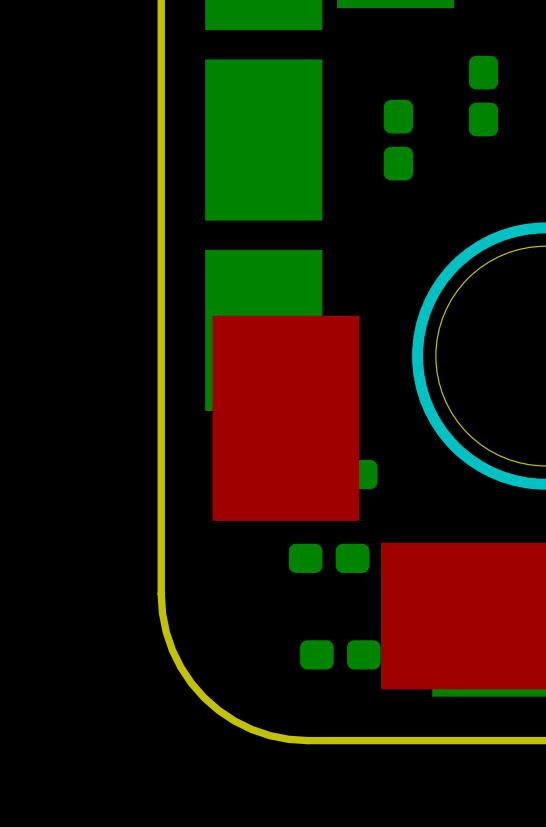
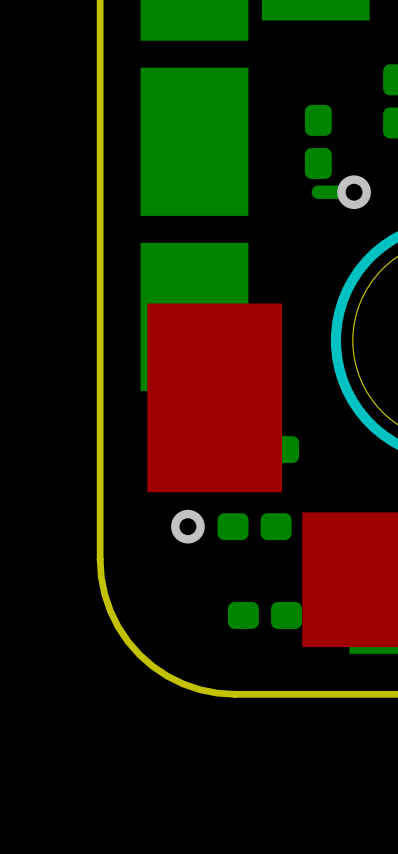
bottom track: none -> (318, 192) (354, 192)
via: none -> (354, 192)
via: none -> (187, 526)

